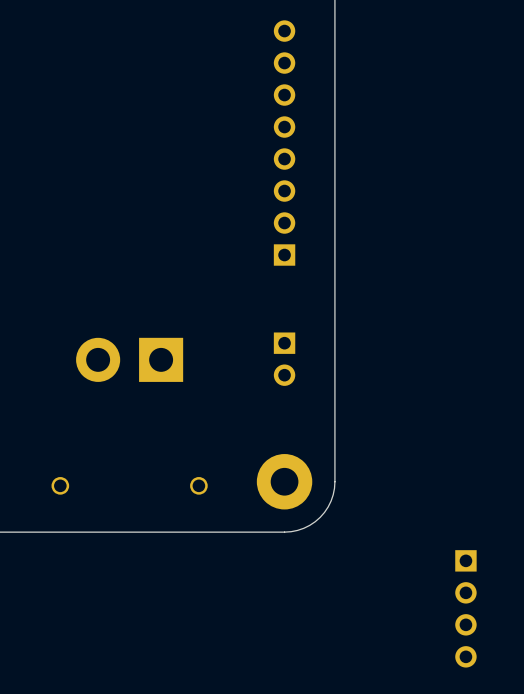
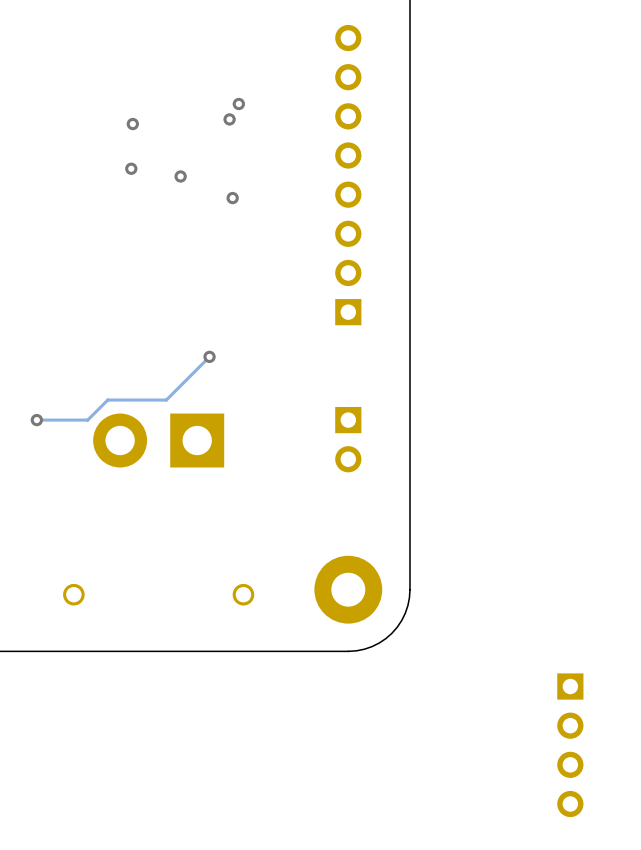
via: none -> (238, 104)
via: none -> (229, 119)
via: none -> (132, 124)
via: none -> (131, 168)
via: none -> (180, 176)
via: none -> (232, 198)
track: none -> (209, 356) (166, 400) (107, 400) (87, 420) (36, 420)
via: none -> (209, 356)
via: none -> (36, 420)

